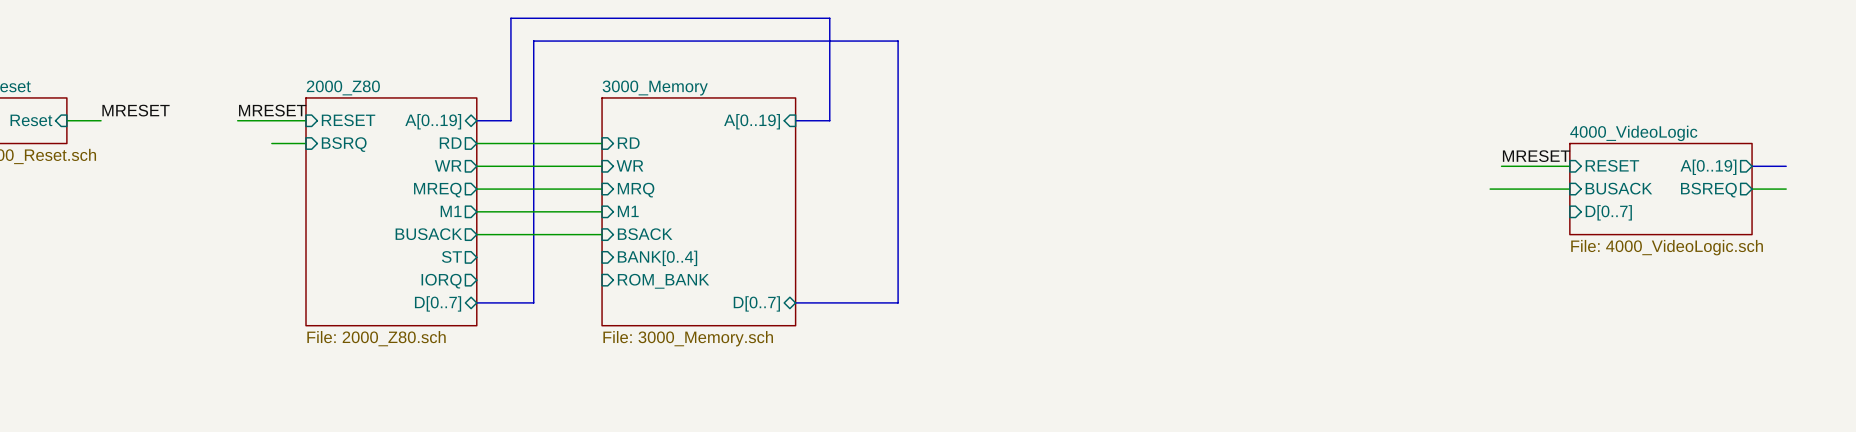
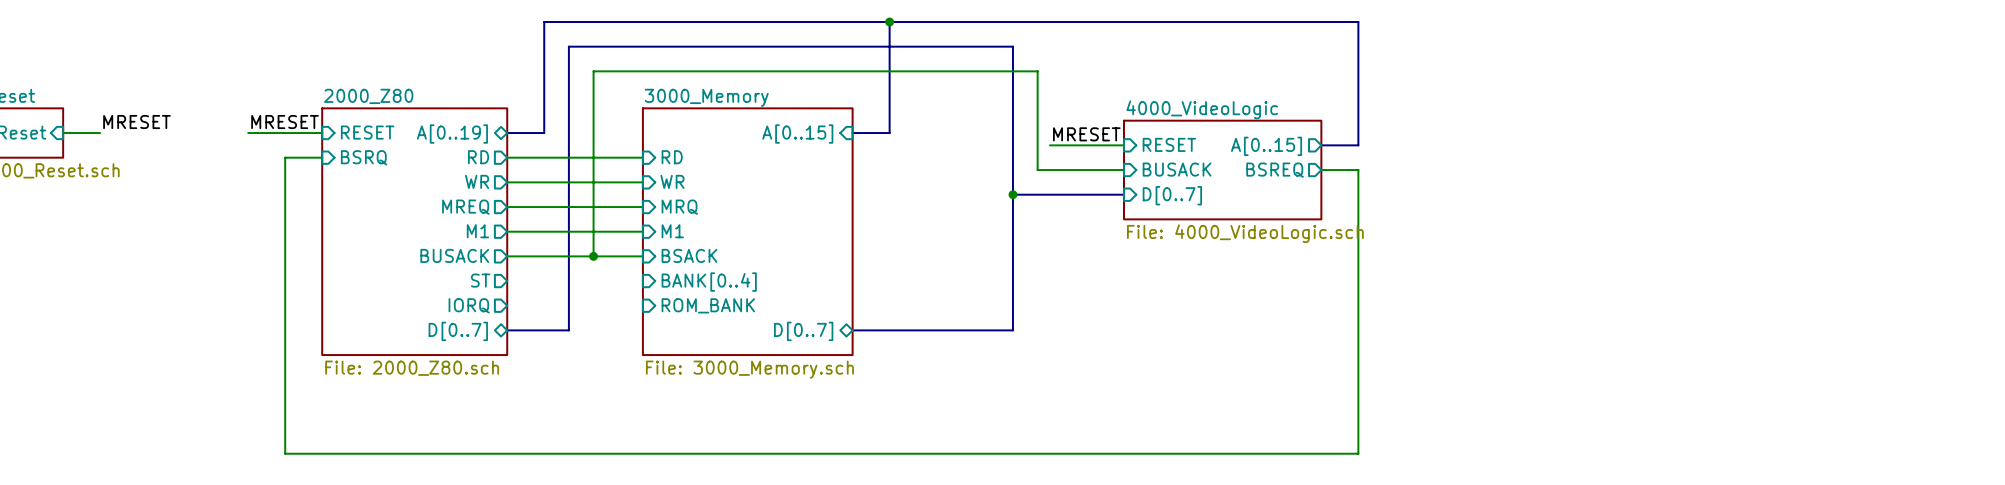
bus: none -> (889, 22) (1358, 22) (1358, 145) (1321, 145)
junction: none -> (889, 22)
bus: (898, 41) (898, 302) -> (963, 46) (1012, 46) (1012, 330) (963, 330)
sheet pin: A[0..19] (752, 121) -> A[0..15] (797, 134)
label: none -> MRESET (1086, 134)
sheet pin: none -> RESET (1169, 144)
wire: none -> (1049, 145) (1123, 145)
sheet pin: none -> A[0..15] (1266, 146)
wire: none -> (285, 157) (285, 453) (1358, 453) (1358, 170) (1321, 170)
wire: none -> (1123, 170) (1037, 170) (1037, 71) (593, 71) (593, 256)
sheet pin: none -> BUSACK (1177, 169)
sheet pin: none -> BSREQ (1275, 170)
label: MRESET (1536, 156) -> none
sheet pin: RESET (1612, 165) -> none
wire: (1501, 166) (1569, 166) -> none
bus: (1752, 166) (1786, 166) -> none
sheet pin: A[0..19] (1708, 167) -> none
bus: none -> (1012, 194) (1123, 194)
junction: none -> (1012, 194)
sheet pin: none -> D[0..7] (1172, 195)
sheet pin: BUSACK (1618, 188) -> none
wire: (1490, 189) (1569, 189) -> none
sheet 4000_VideoLogic position: (1660, 189) -> (1222, 170)
wire: (1752, 189) (1786, 189) -> none
sheet pin: BSREQ (1708, 190) -> none
sheet pin: D[0..7] (1608, 212) -> none
junction: none -> (593, 256)

